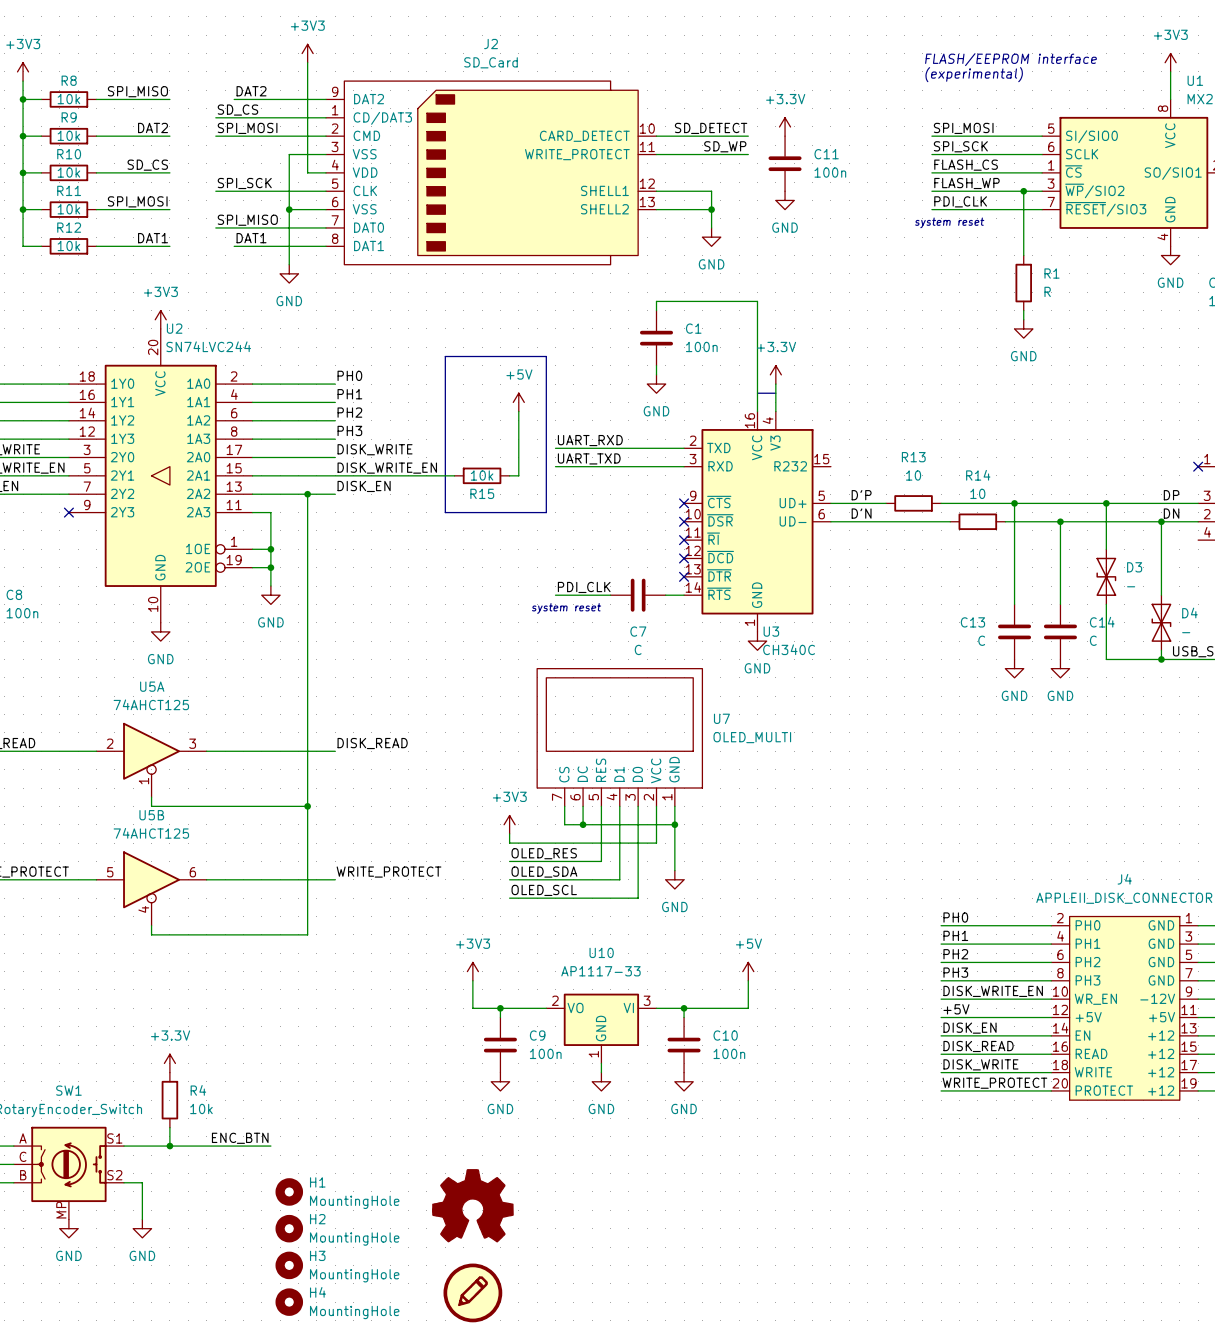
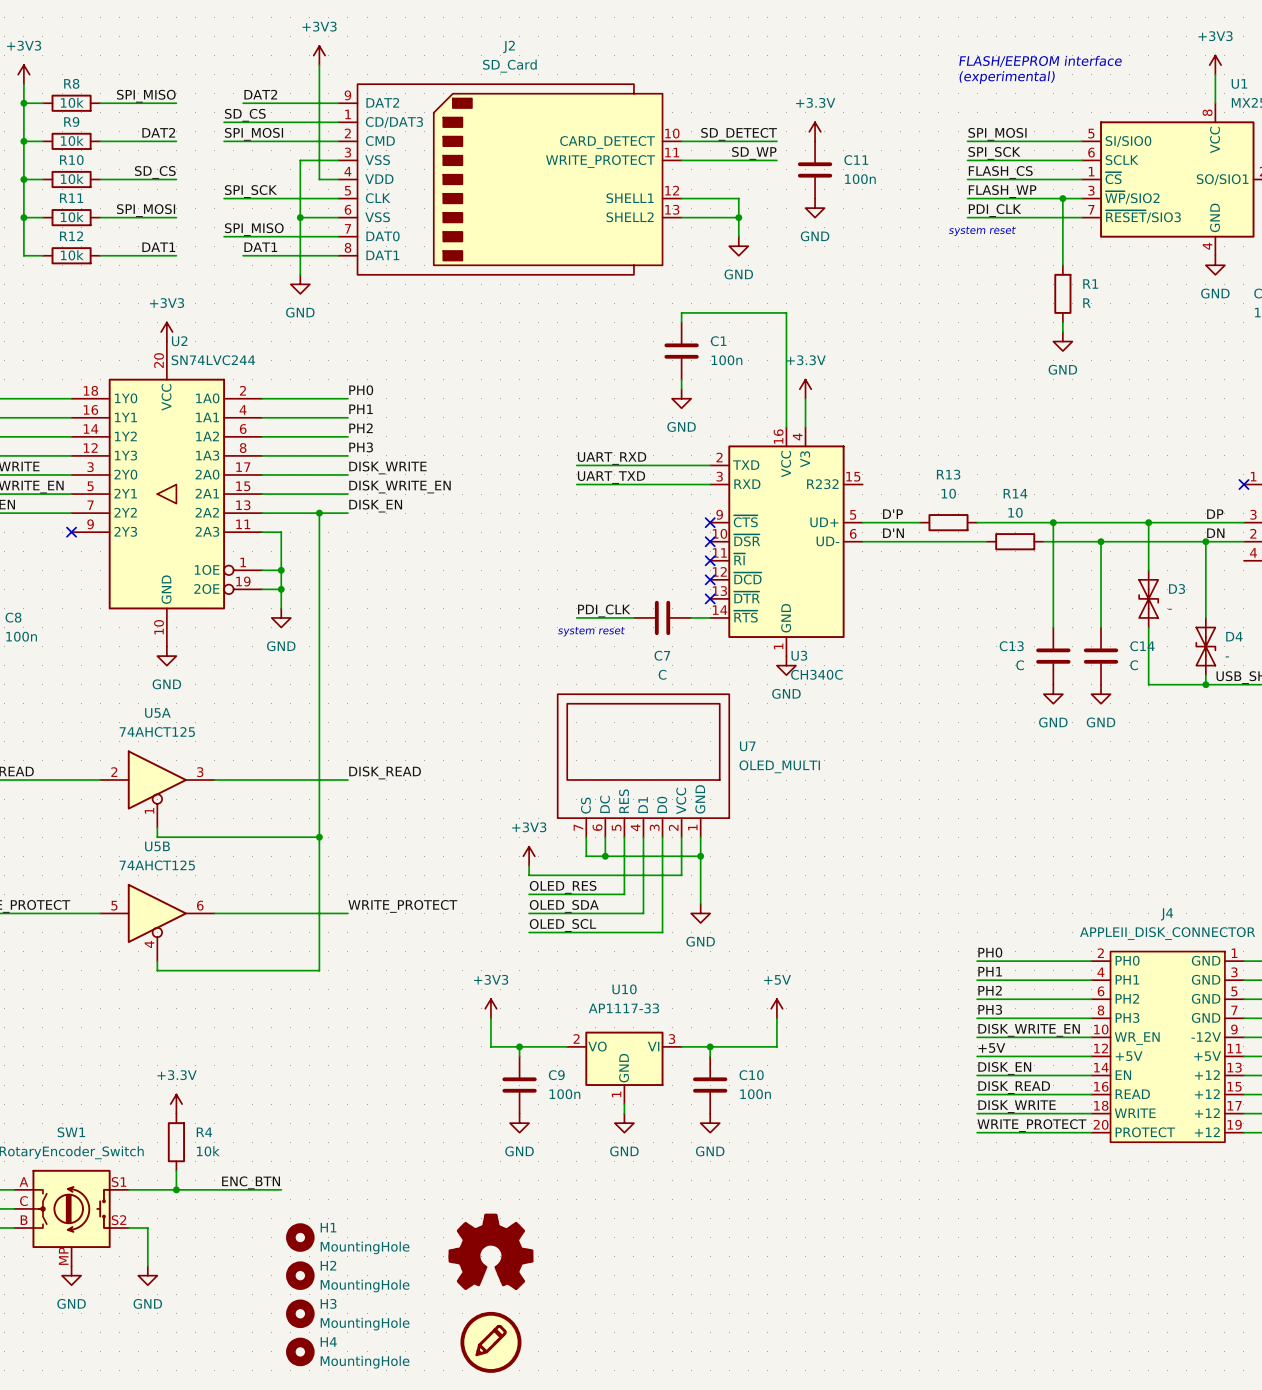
line: (445, 356) (546, 356) (546, 512) (445, 512) (445, 356) -> none
line: (757, 393) (775, 393) -> none
power symbol: +5V (518, 402) -> none
wire: (518, 411) (518, 475) (509, 475) -> none
wire: (335, 475) (454, 475) -> none
R15: 10k (482, 475) -> none

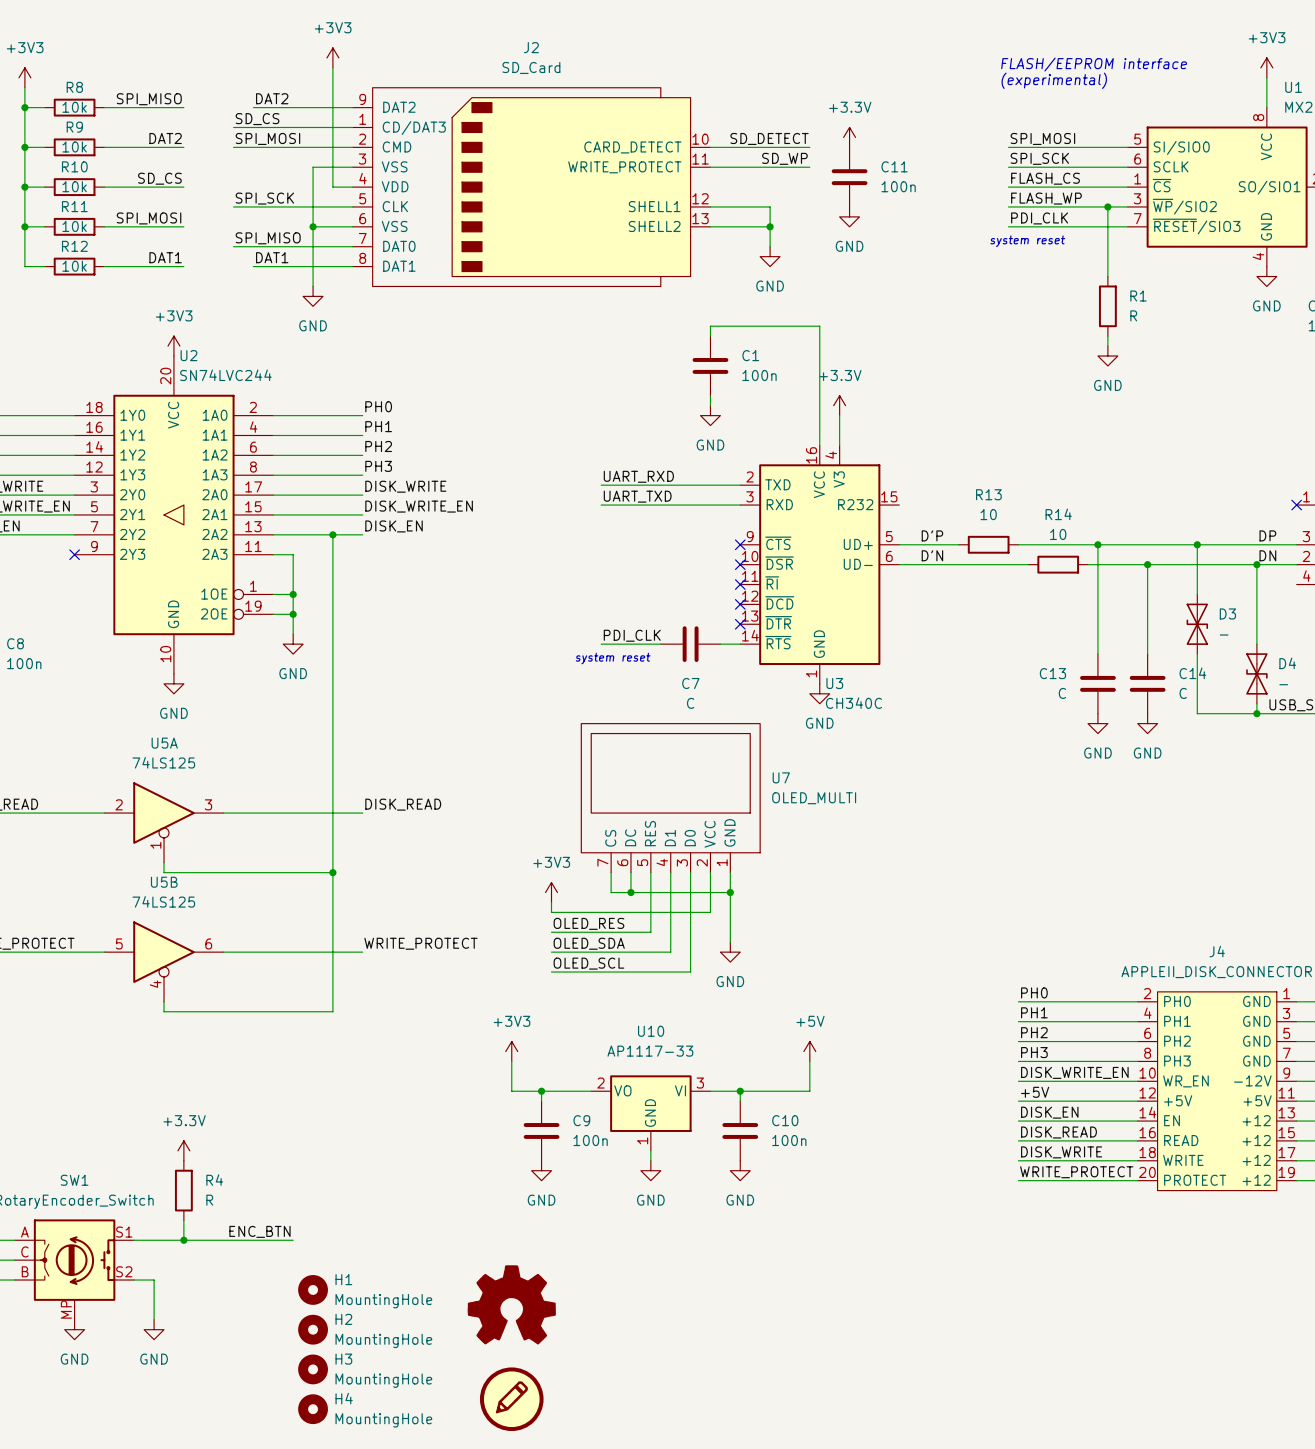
U5A value: 74AHCT125 (157, 732) -> 74LS125 (163, 762)
U5B value: 74AHCT125 (157, 865) -> 74LS125 (163, 901)
R4 value: 10k (208, 1151) -> R (209, 1200)

